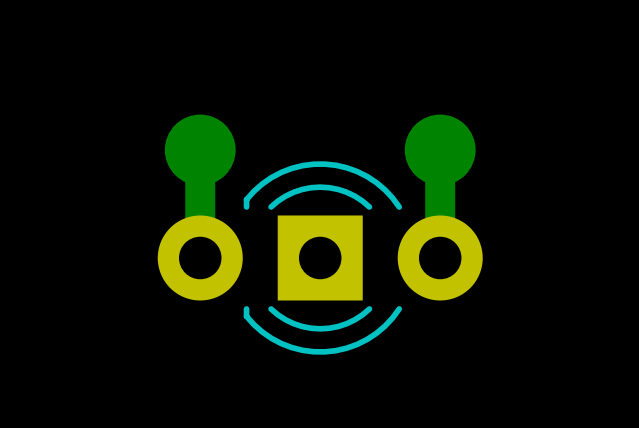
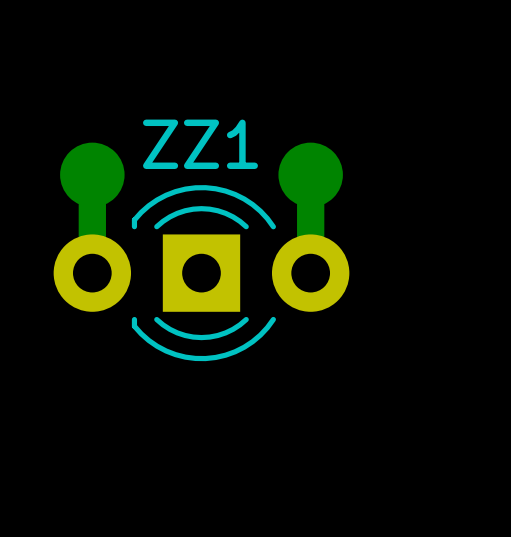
ZZ1 name: none -> ZZ1 (200, 144)

